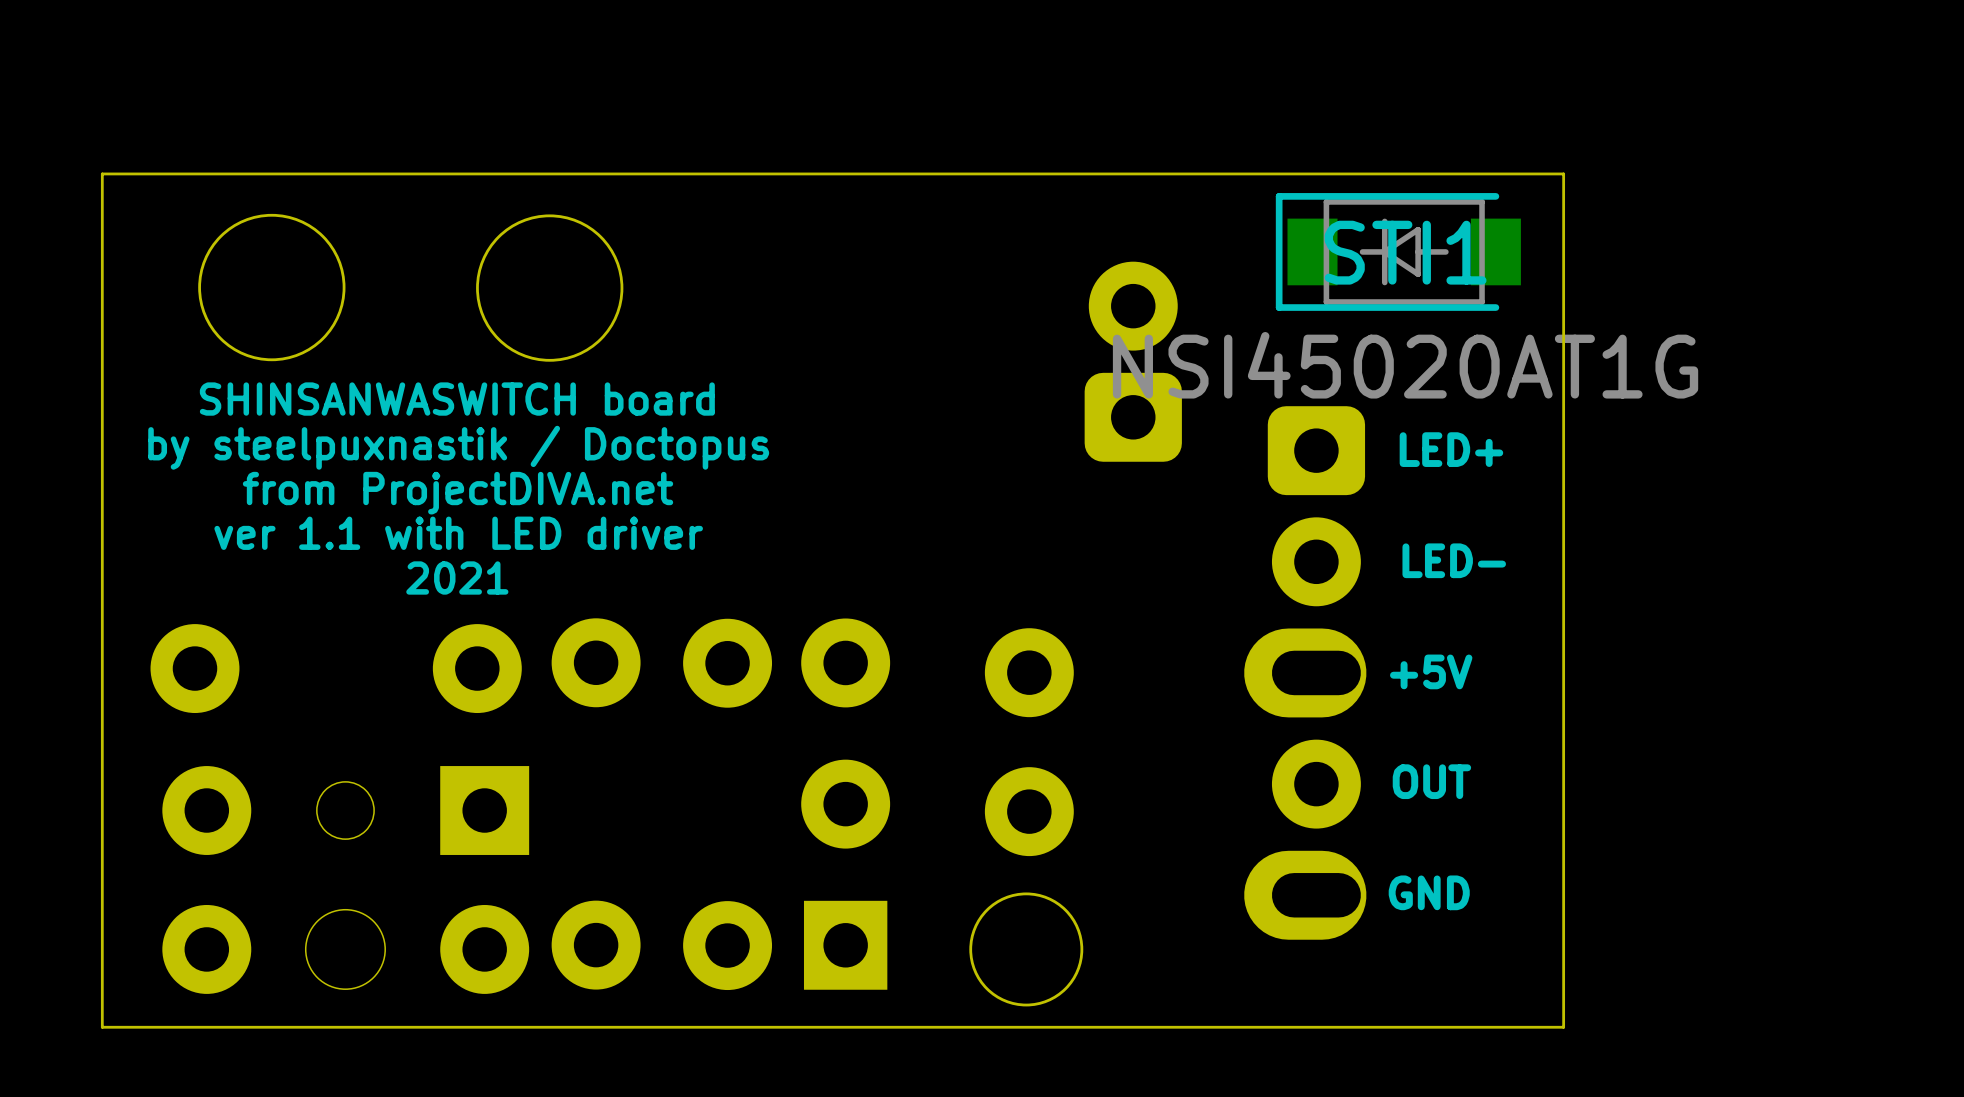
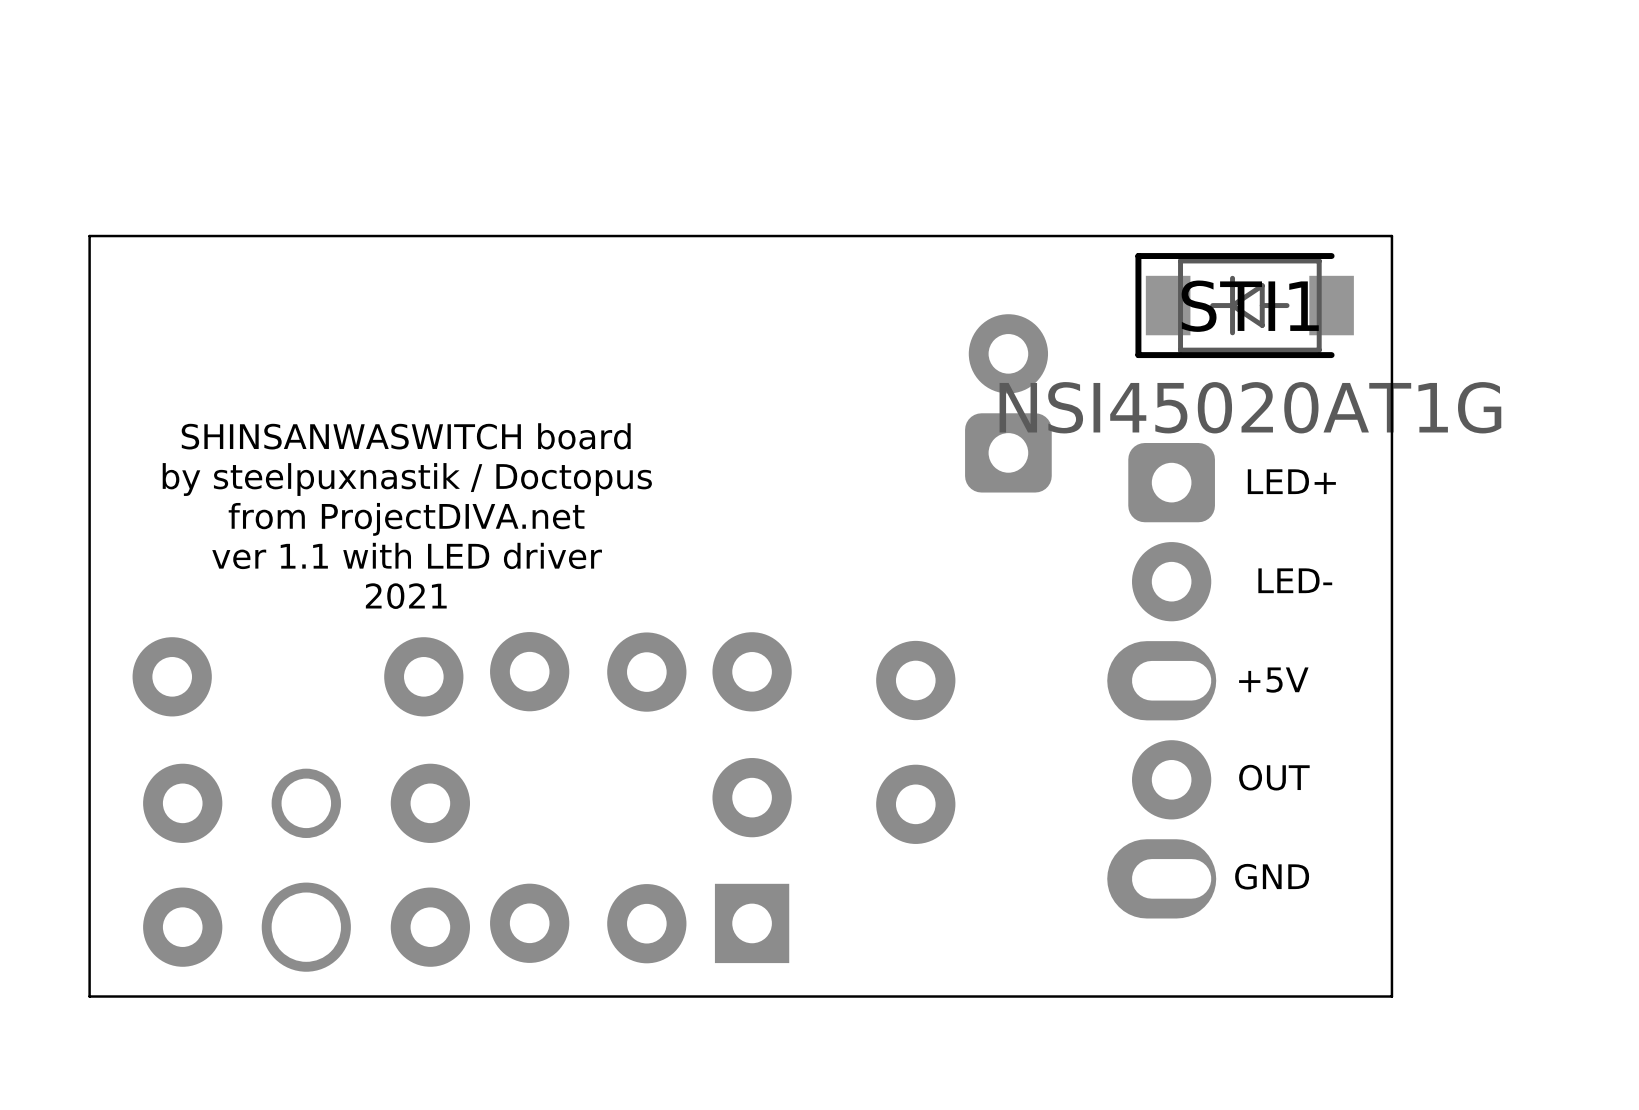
round board edge: [198, 213, 346, 362] -> none
round board edge: [476, 214, 624, 362] -> none
part footprint: [162, 766, 530, 994] -> [143, 763, 471, 972]
round board edge: [969, 892, 1084, 1007] -> none

